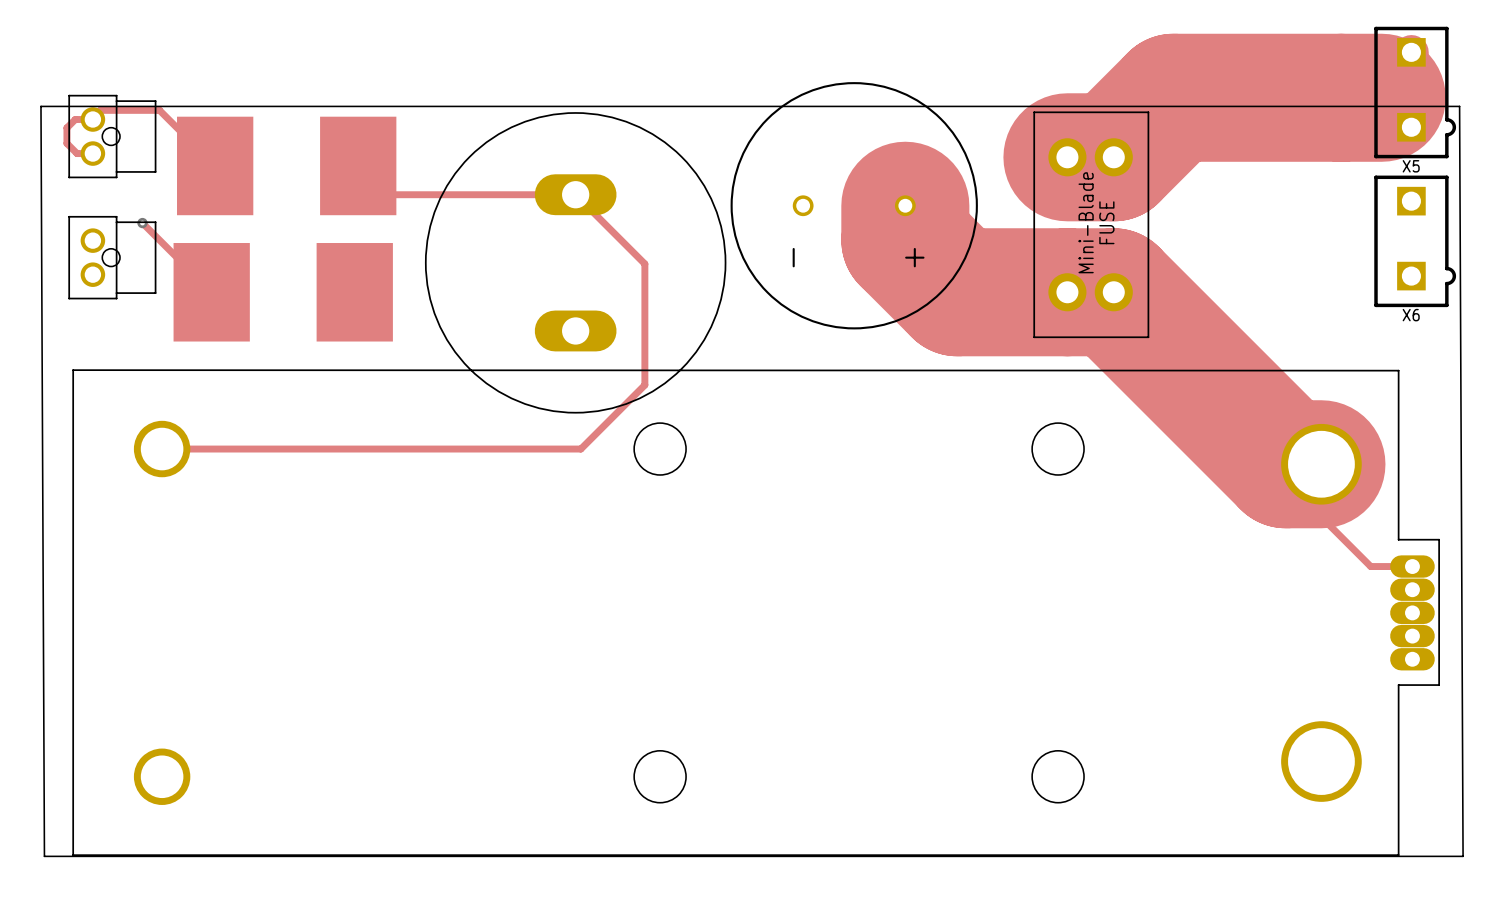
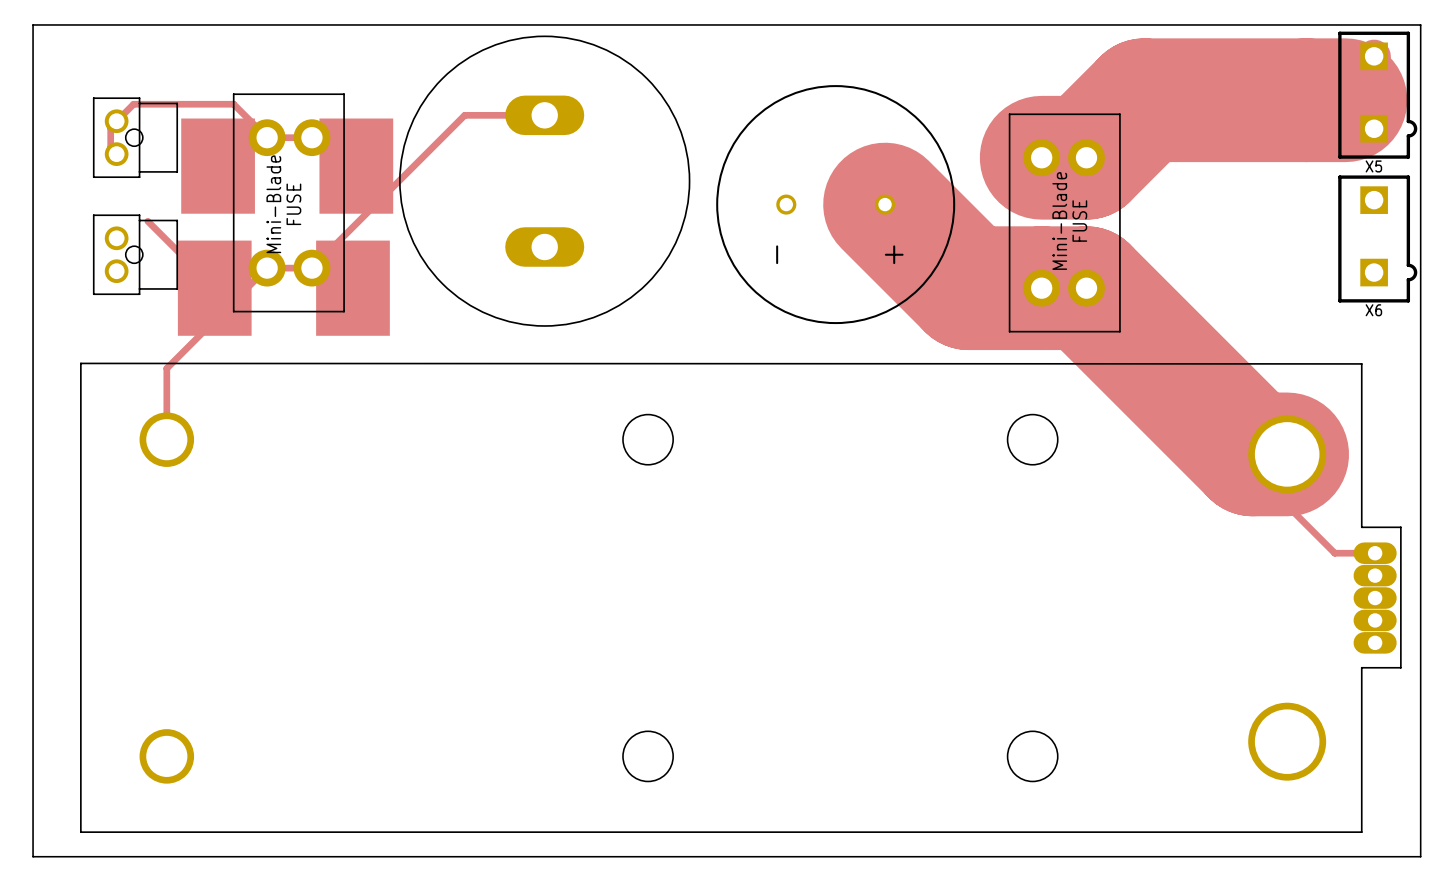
board edge: (40, 106) (1459, 106) (1463, 856) (44, 856) (40, 106) -> (33, 24) (33, 856) (1420, 856) (1420, 24) (33, 24)
part position: (112, 136) -> (135, 137)
track: none -> (311, 137) (267, 137) (233, 104) (133, 104) (110, 127) (110, 147) (116, 154)
track: (92, 153) (77, 153) (66, 143) (66, 127) (75, 119) (91, 119) (100, 110) (159, 110) (215, 165) -> none
track: (358, 165) (386, 194) (575, 194) (644, 263) (644, 385) (580, 449) (162, 449) -> (544, 115) (464, 115) (311, 268) (267, 268) (166, 368) (166, 439)
part: none -> (288, 202)
track: (905, 205) (905, 240) (957, 292) (991, 292) -> (885, 204) (968, 288)
via: (142, 223) -> none
part position: (112, 257) -> (135, 254)
part position: (575, 262) -> (544, 181)

